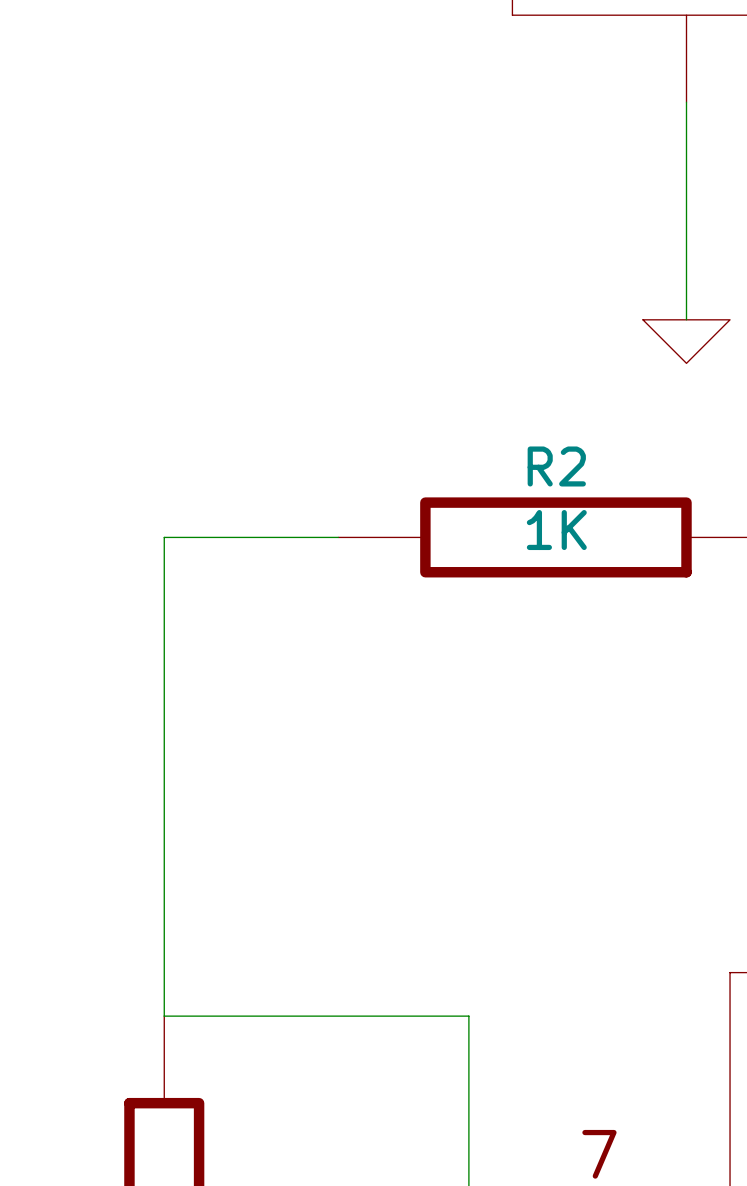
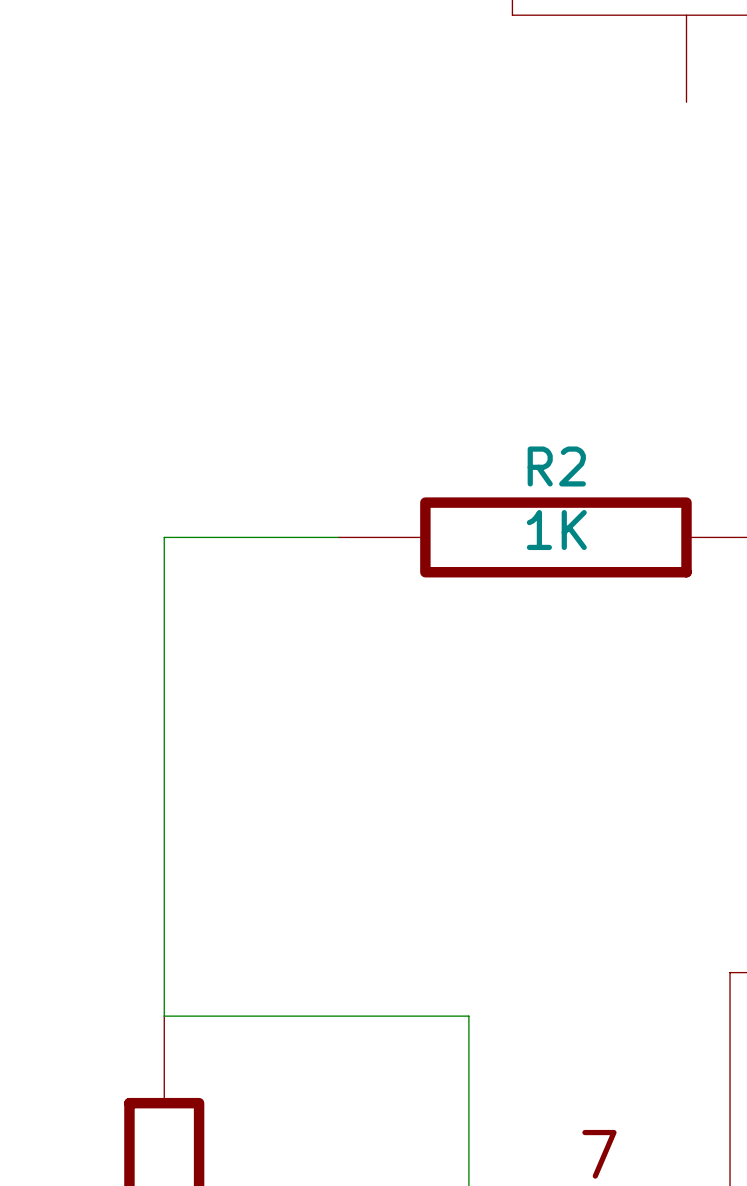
wire: (686, 102) (686, 319) -> none
power symbol: (686, 341) -> none

